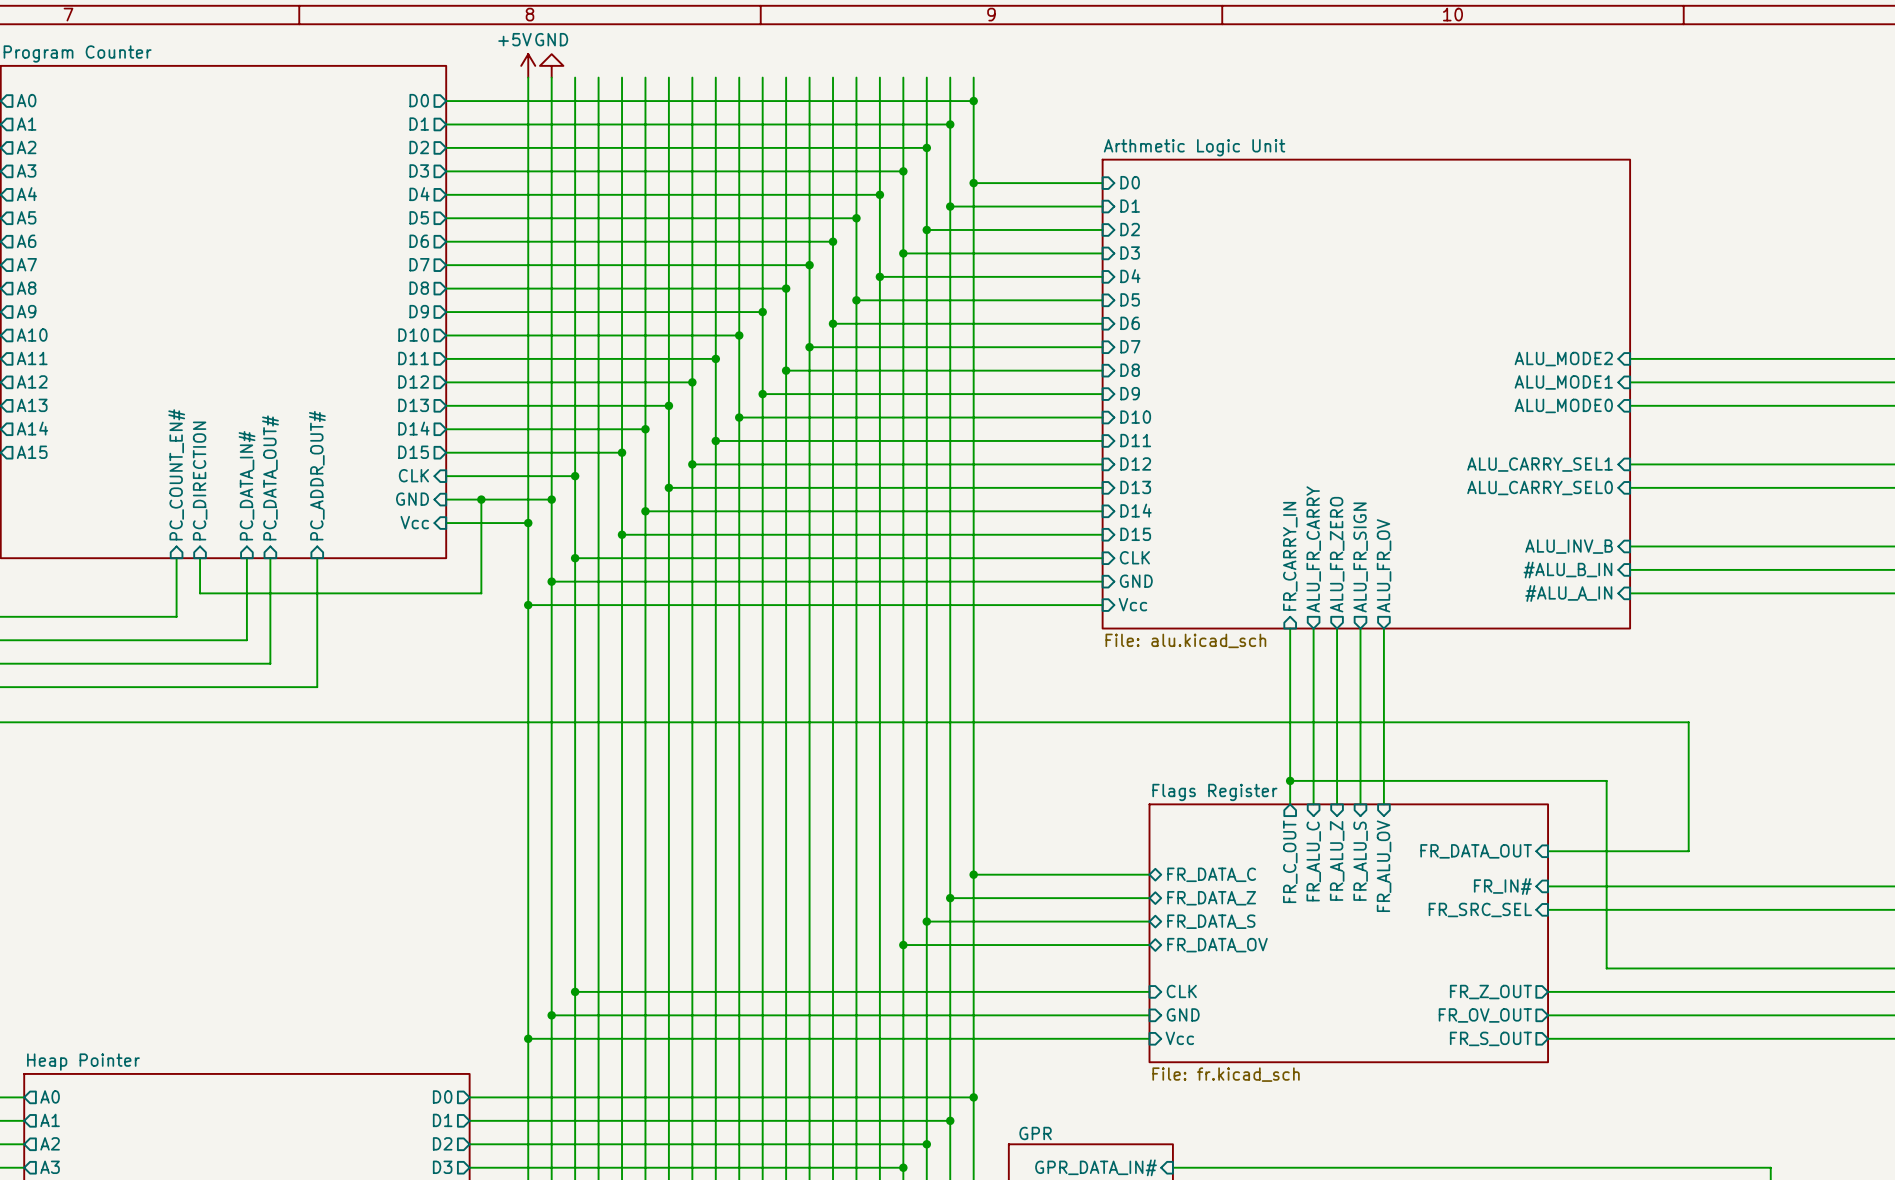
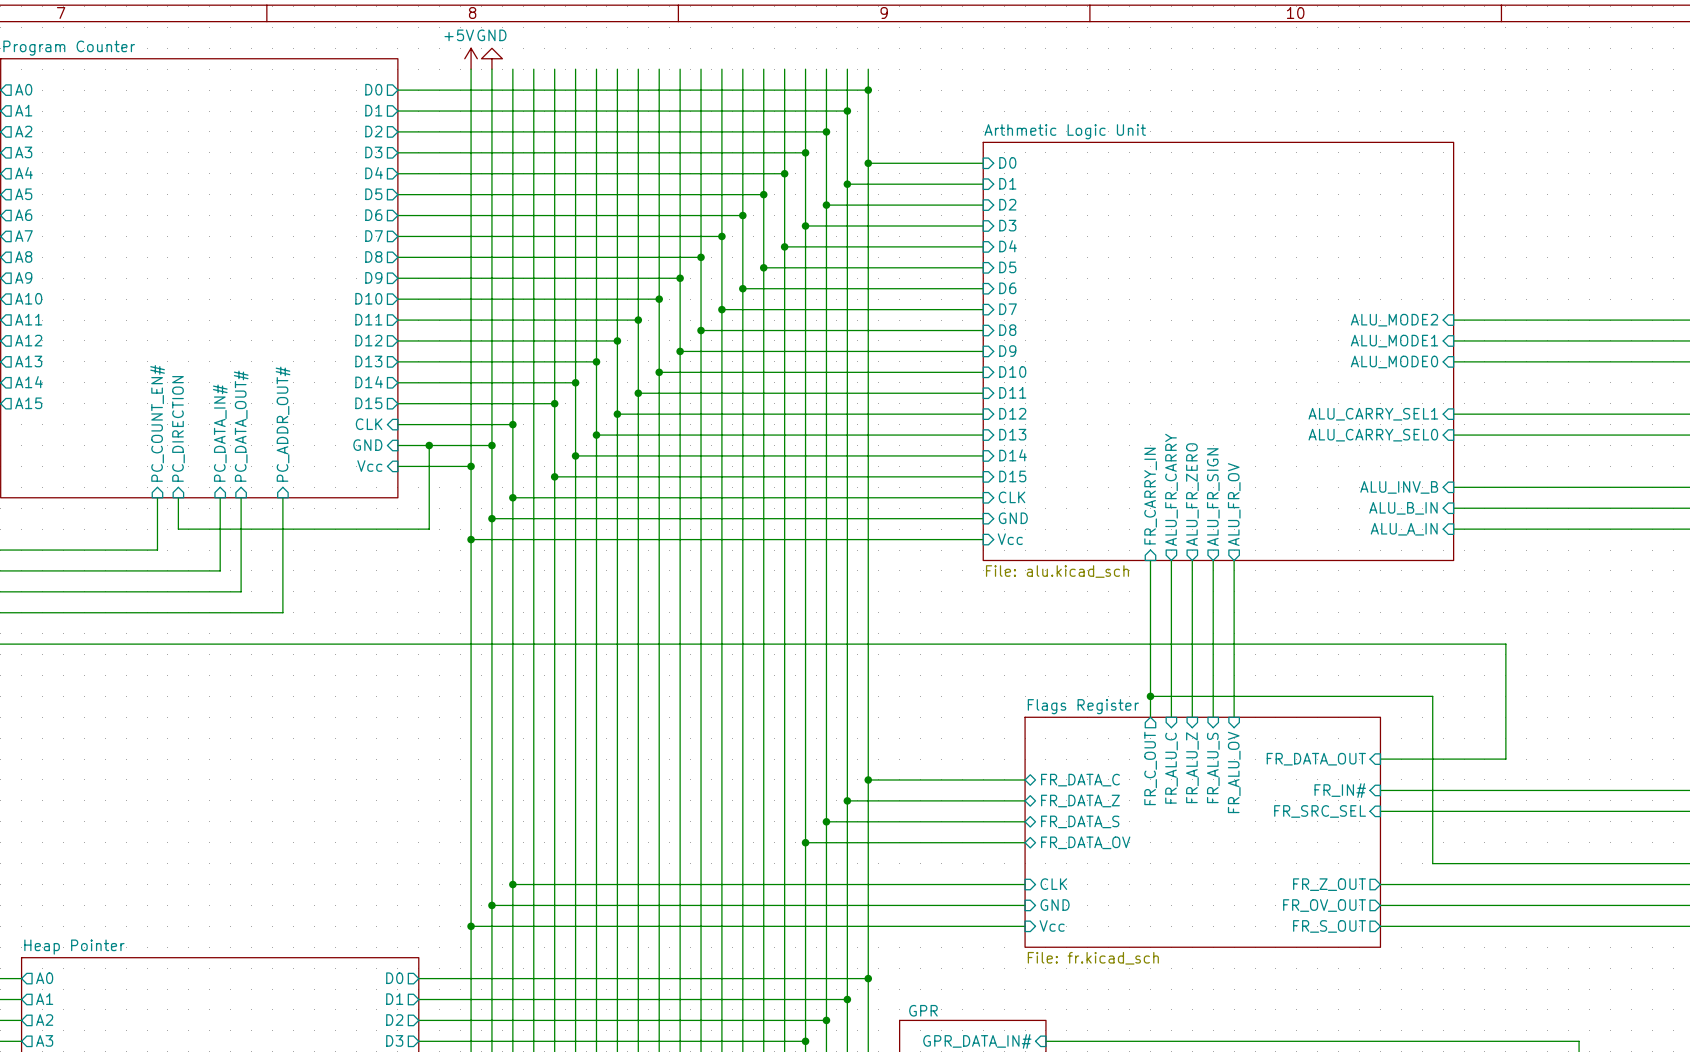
sheet pin: #ALU_B_IN (1567, 570) -> ALU_B_IN (1403, 508)
sheet pin: #ALU_A_IN (1568, 593) -> ALU_A_IN (1404, 529)

